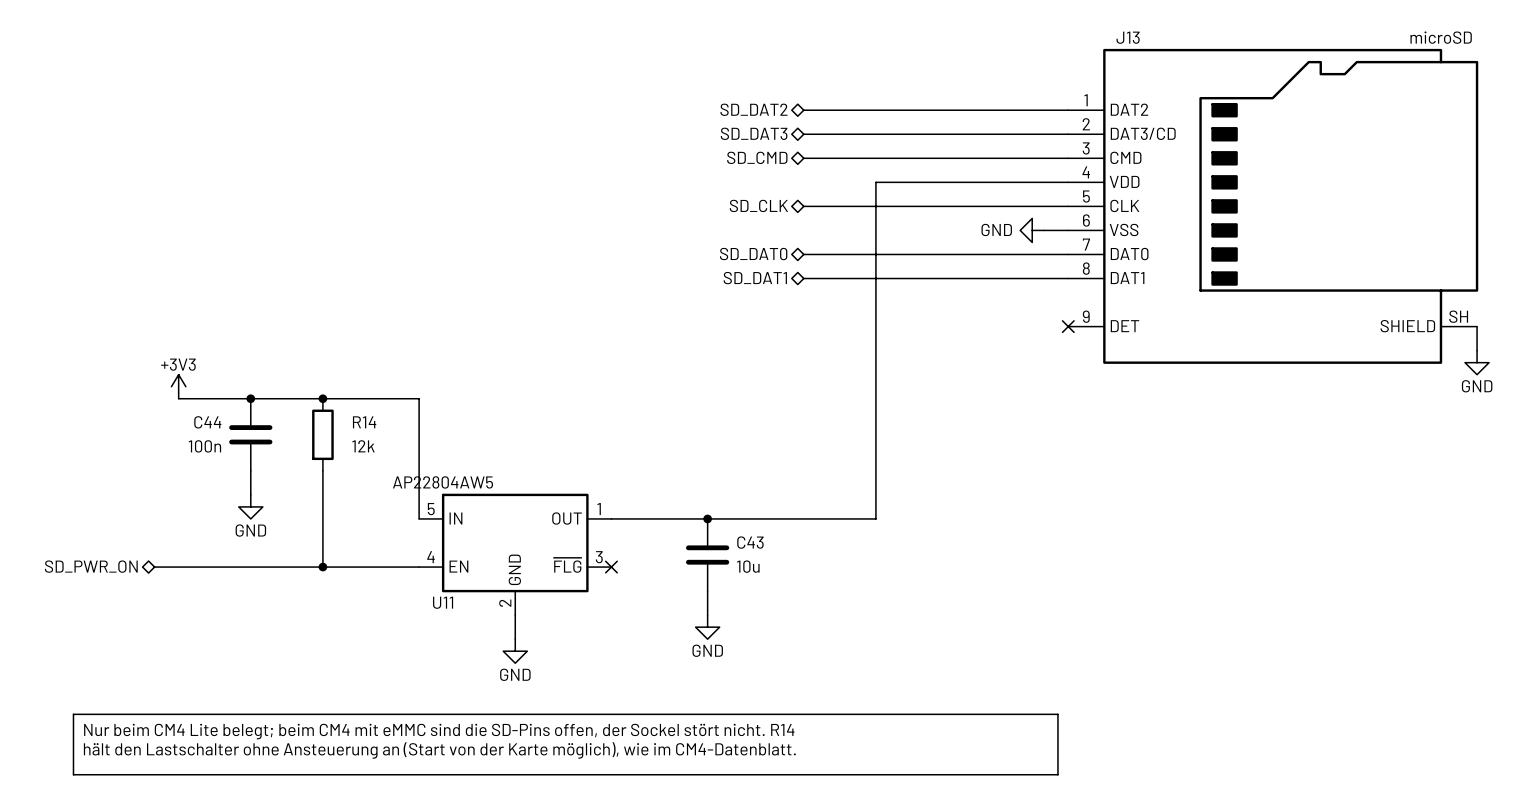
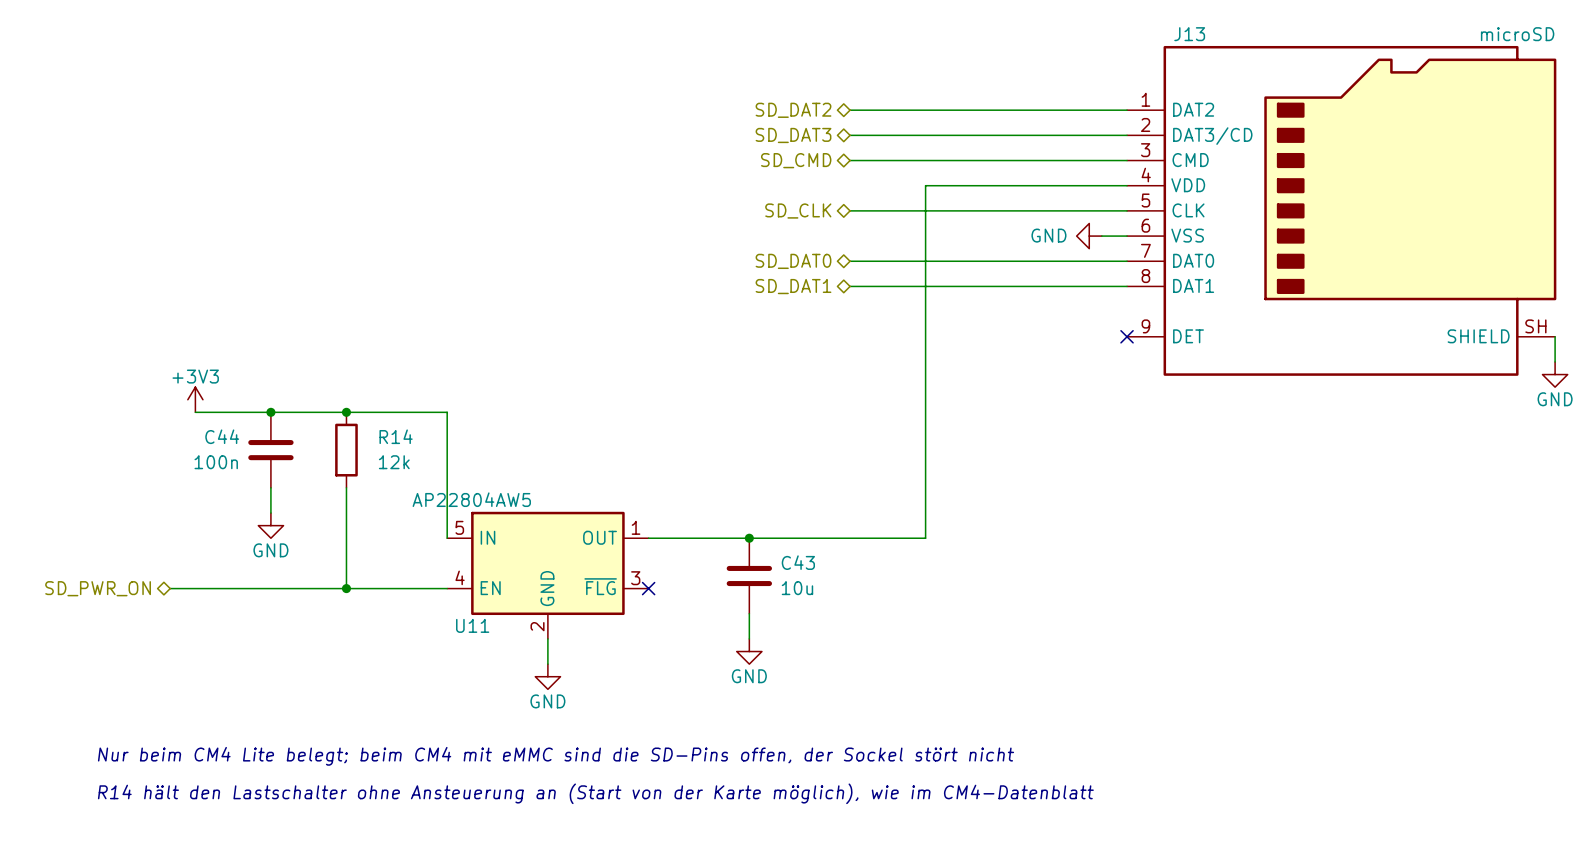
line: (73, 714) (1057, 714) (1057, 774) (73, 774) (73, 714) -> none
text: Nur beim CM4 Lite belegt; beim CM4 mit eMMC sind die SD-Pins offen, der Sockel stört nicht. R14 (439, 731) -> Nur beim CM4 Lite belegt; beim CM4 mit eMMC sind die SD-Pins offen, der Sockel stört nicht (556, 756)
text: hält den Lastschalter ohne Ansteuerung an (Start von der Karte möglich), wie im CM4-Datenblatt. (439, 750) -> R14 hält den Lastschalter ohne Ansteuerung an (Start von der Karte möglich), wie im CM4-Datenblatt (595, 793)

